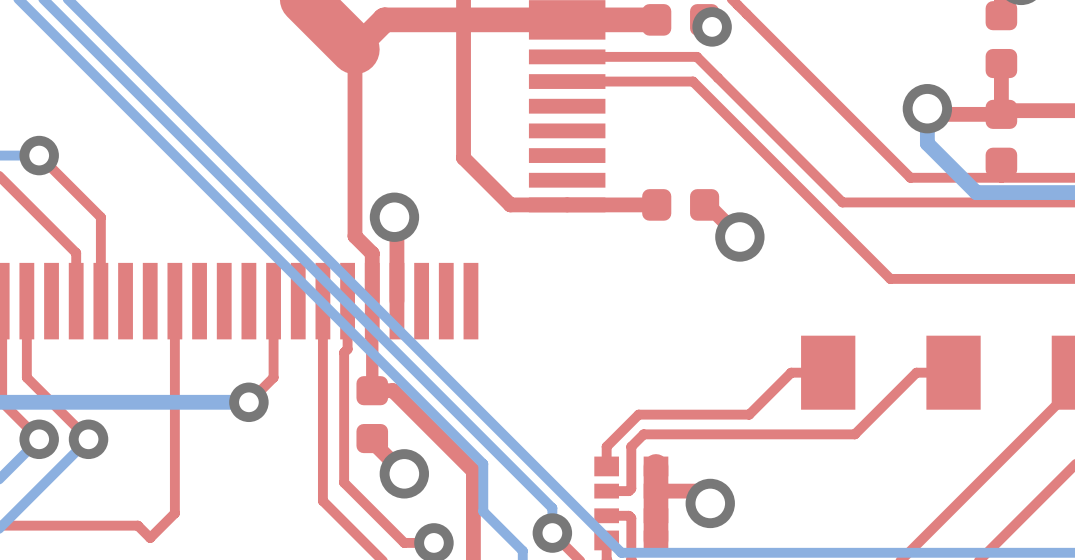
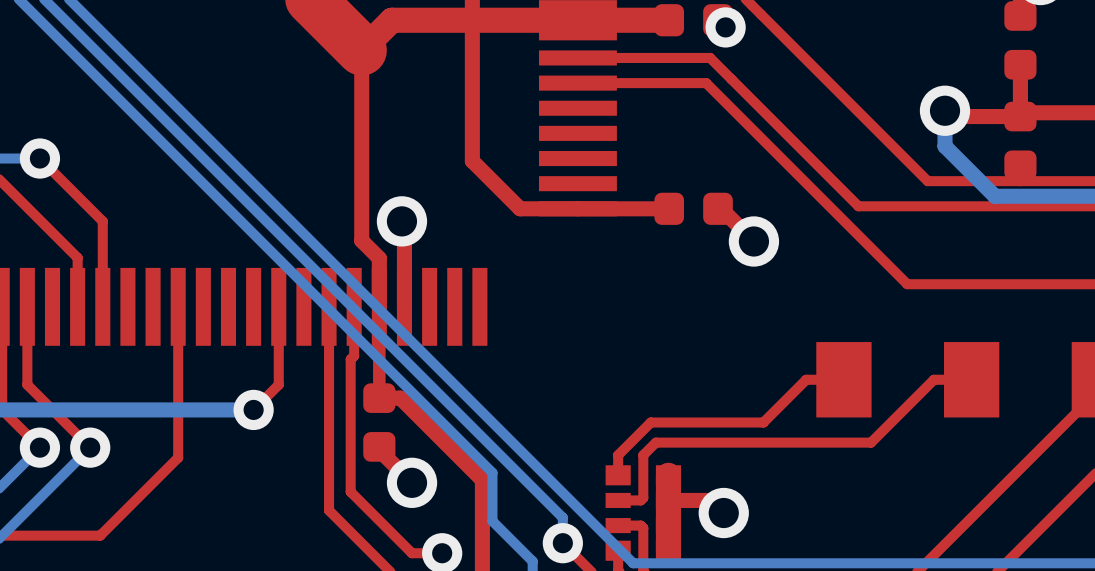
top track: (174, 449) (174, 513) (150, 537) (137, 525) (98, 525) -> (178, 457) (100, 535)

